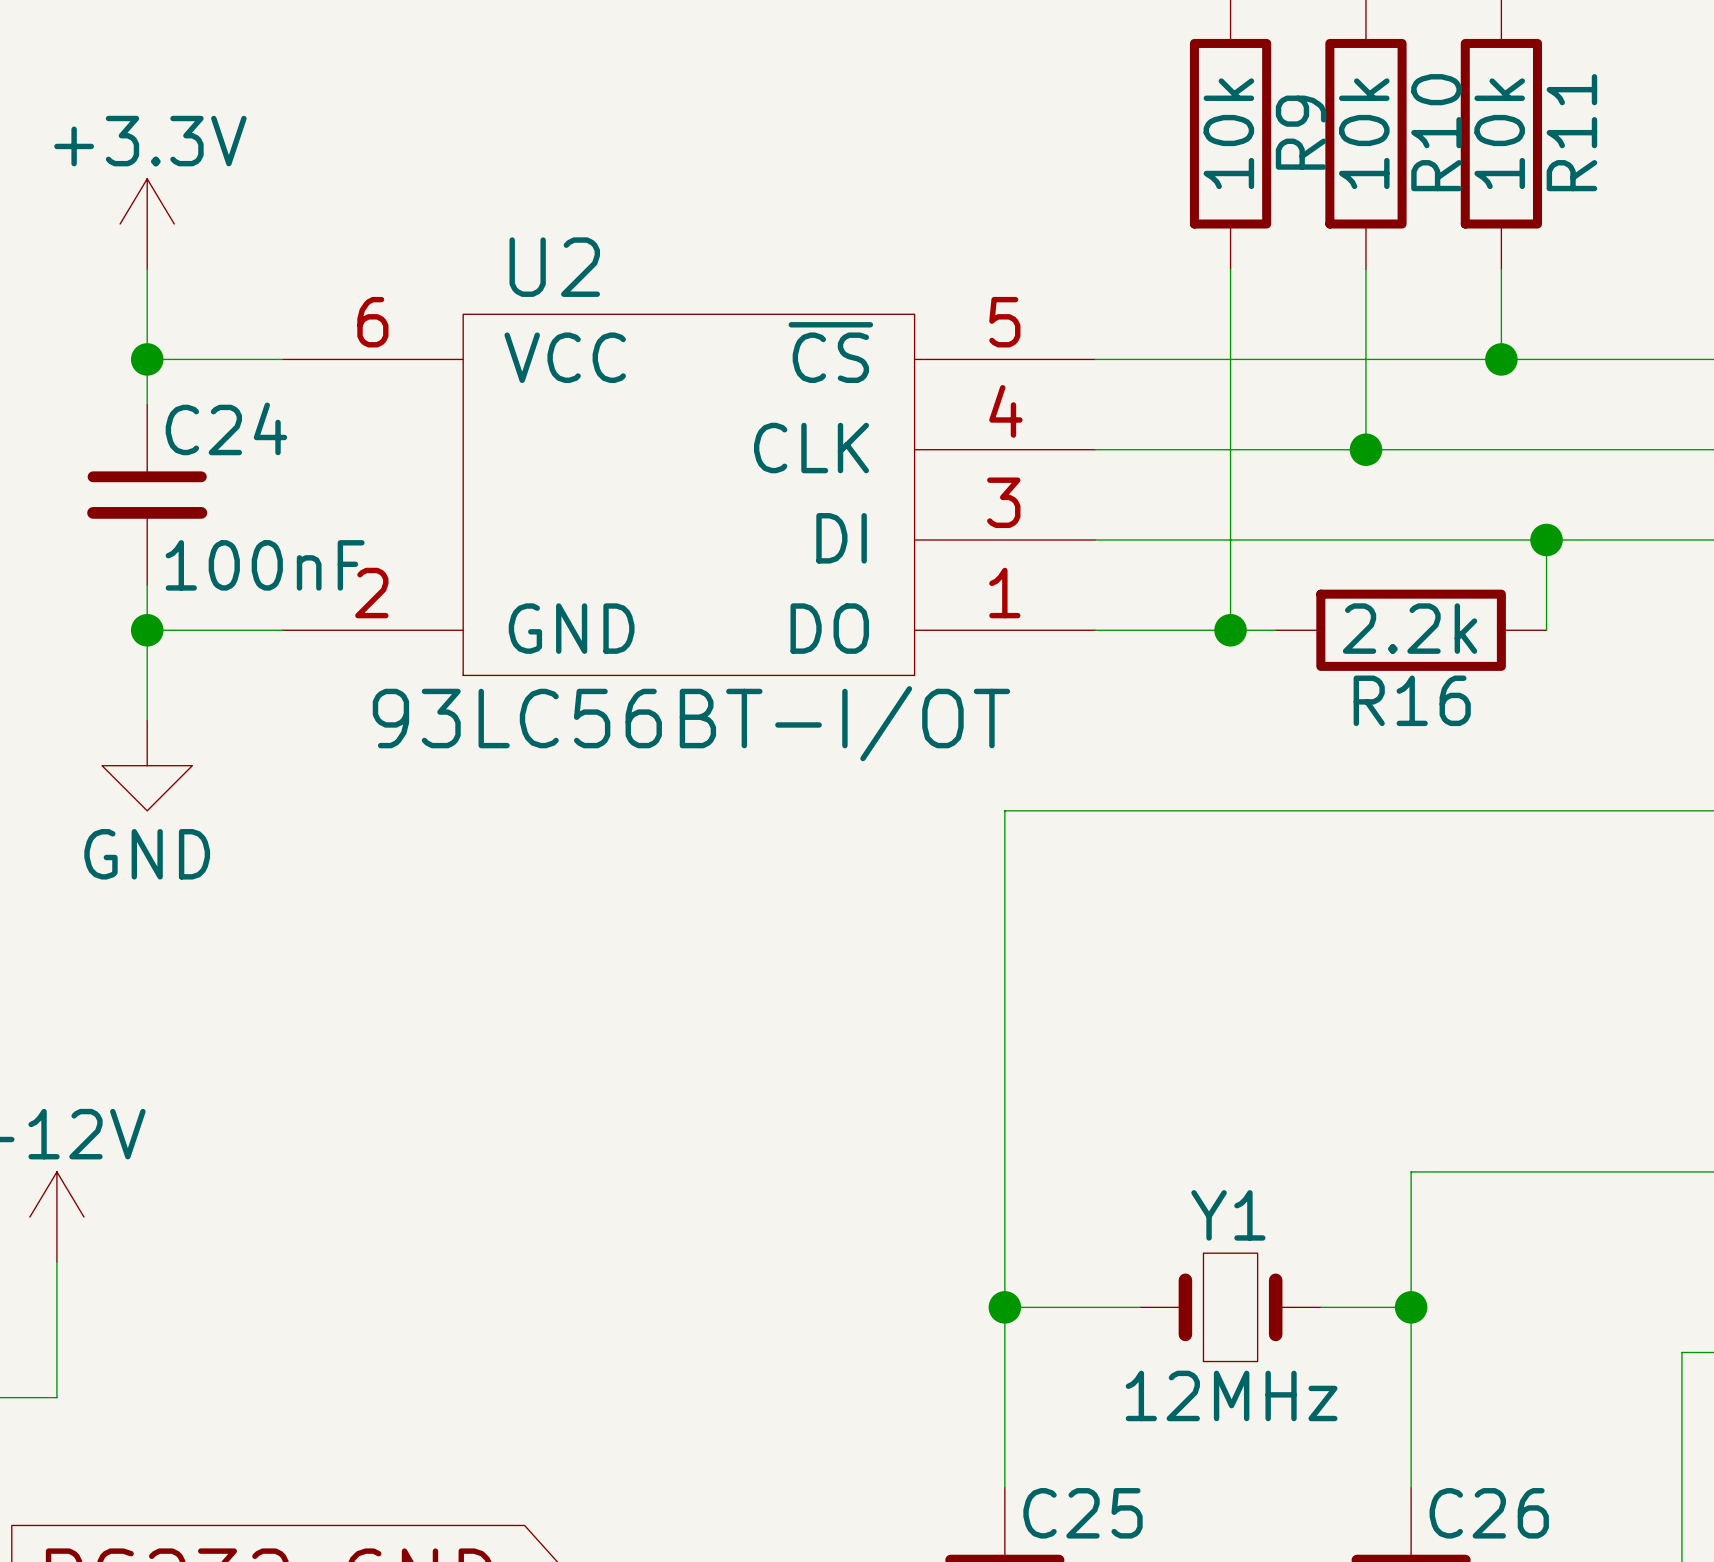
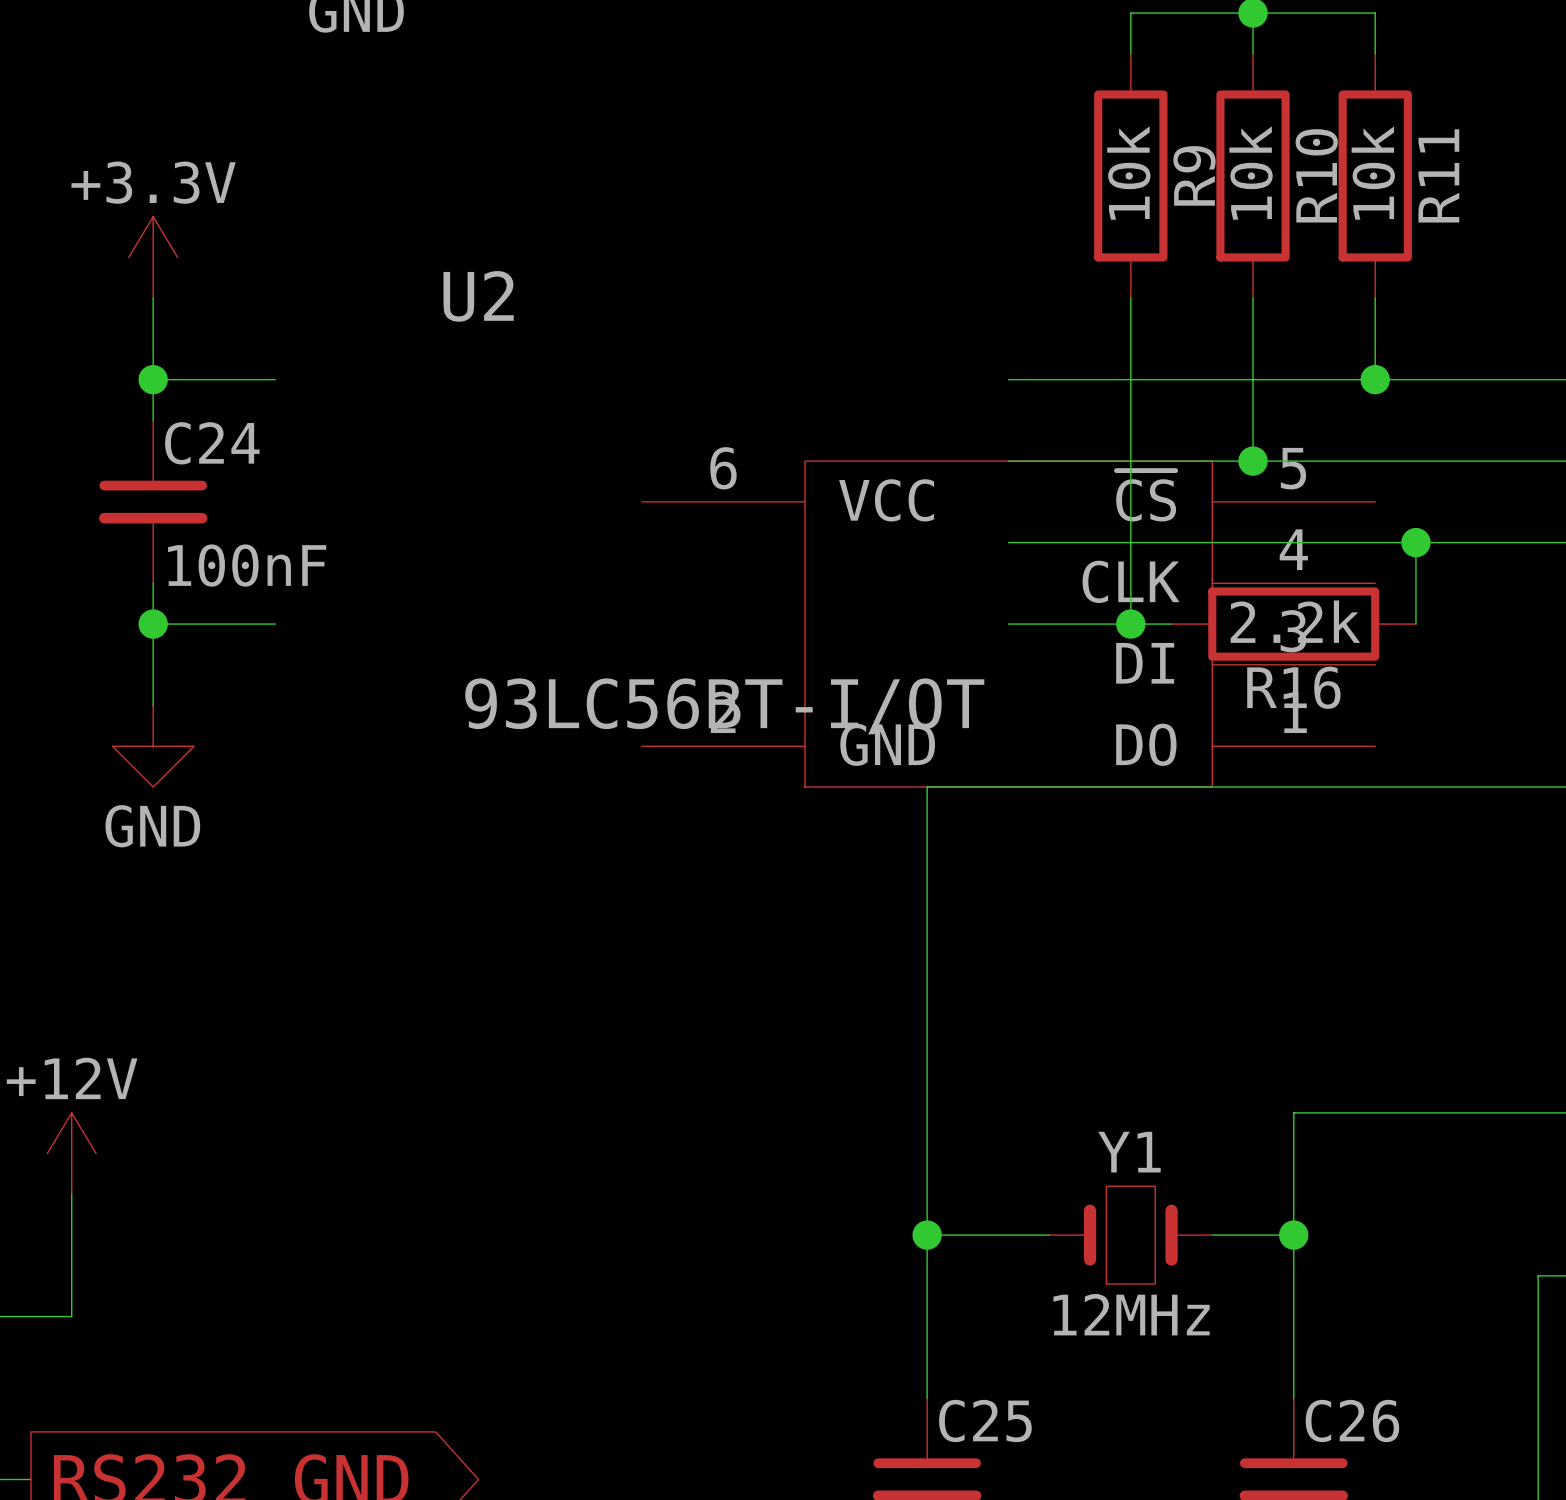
U2 name position: U2 (554, 267) -> U2 (478, 296)
U2 position: (688, 494) -> (1008, 624)
U2 value position: 93LC56BT-I/OT (691, 723) -> 93LC56BT-I/OT (724, 706)

